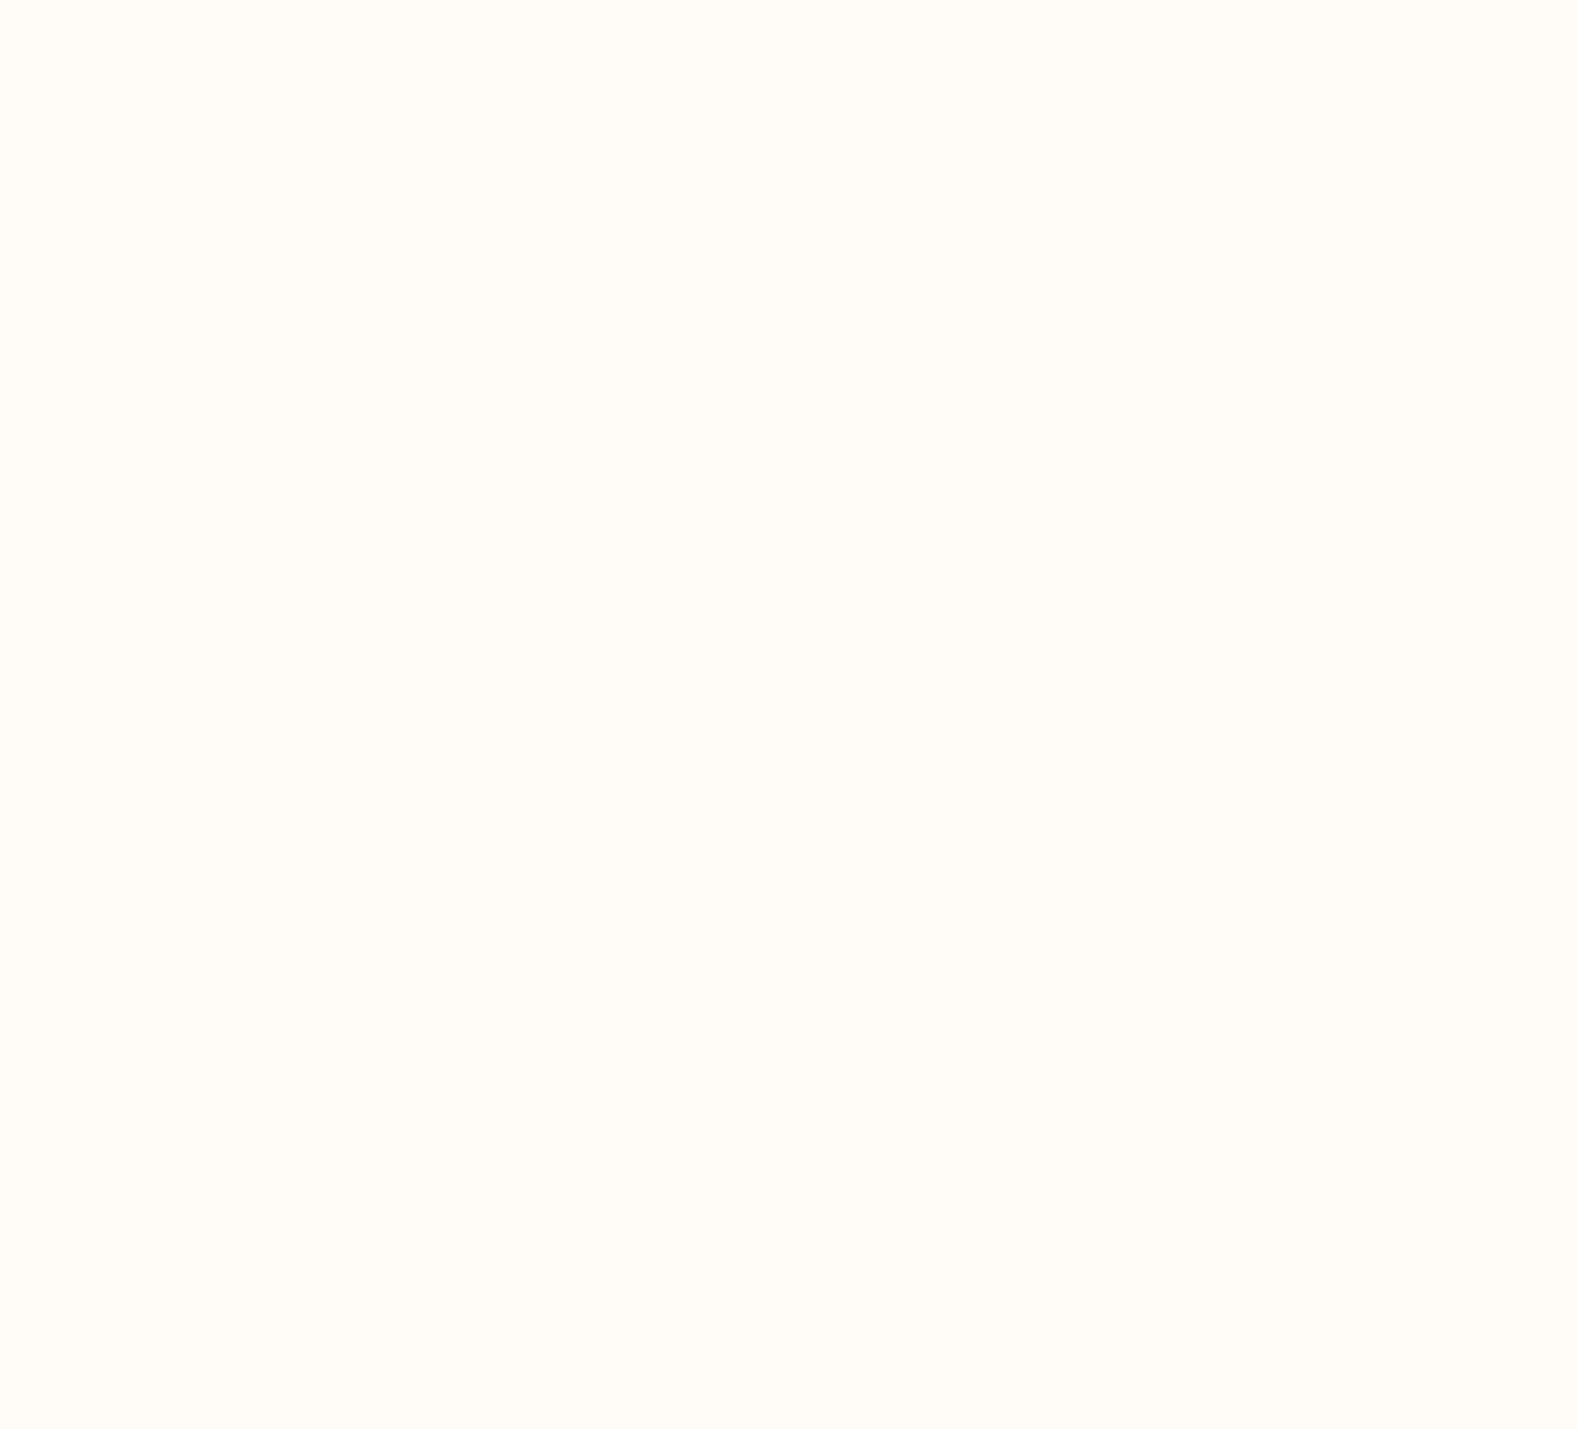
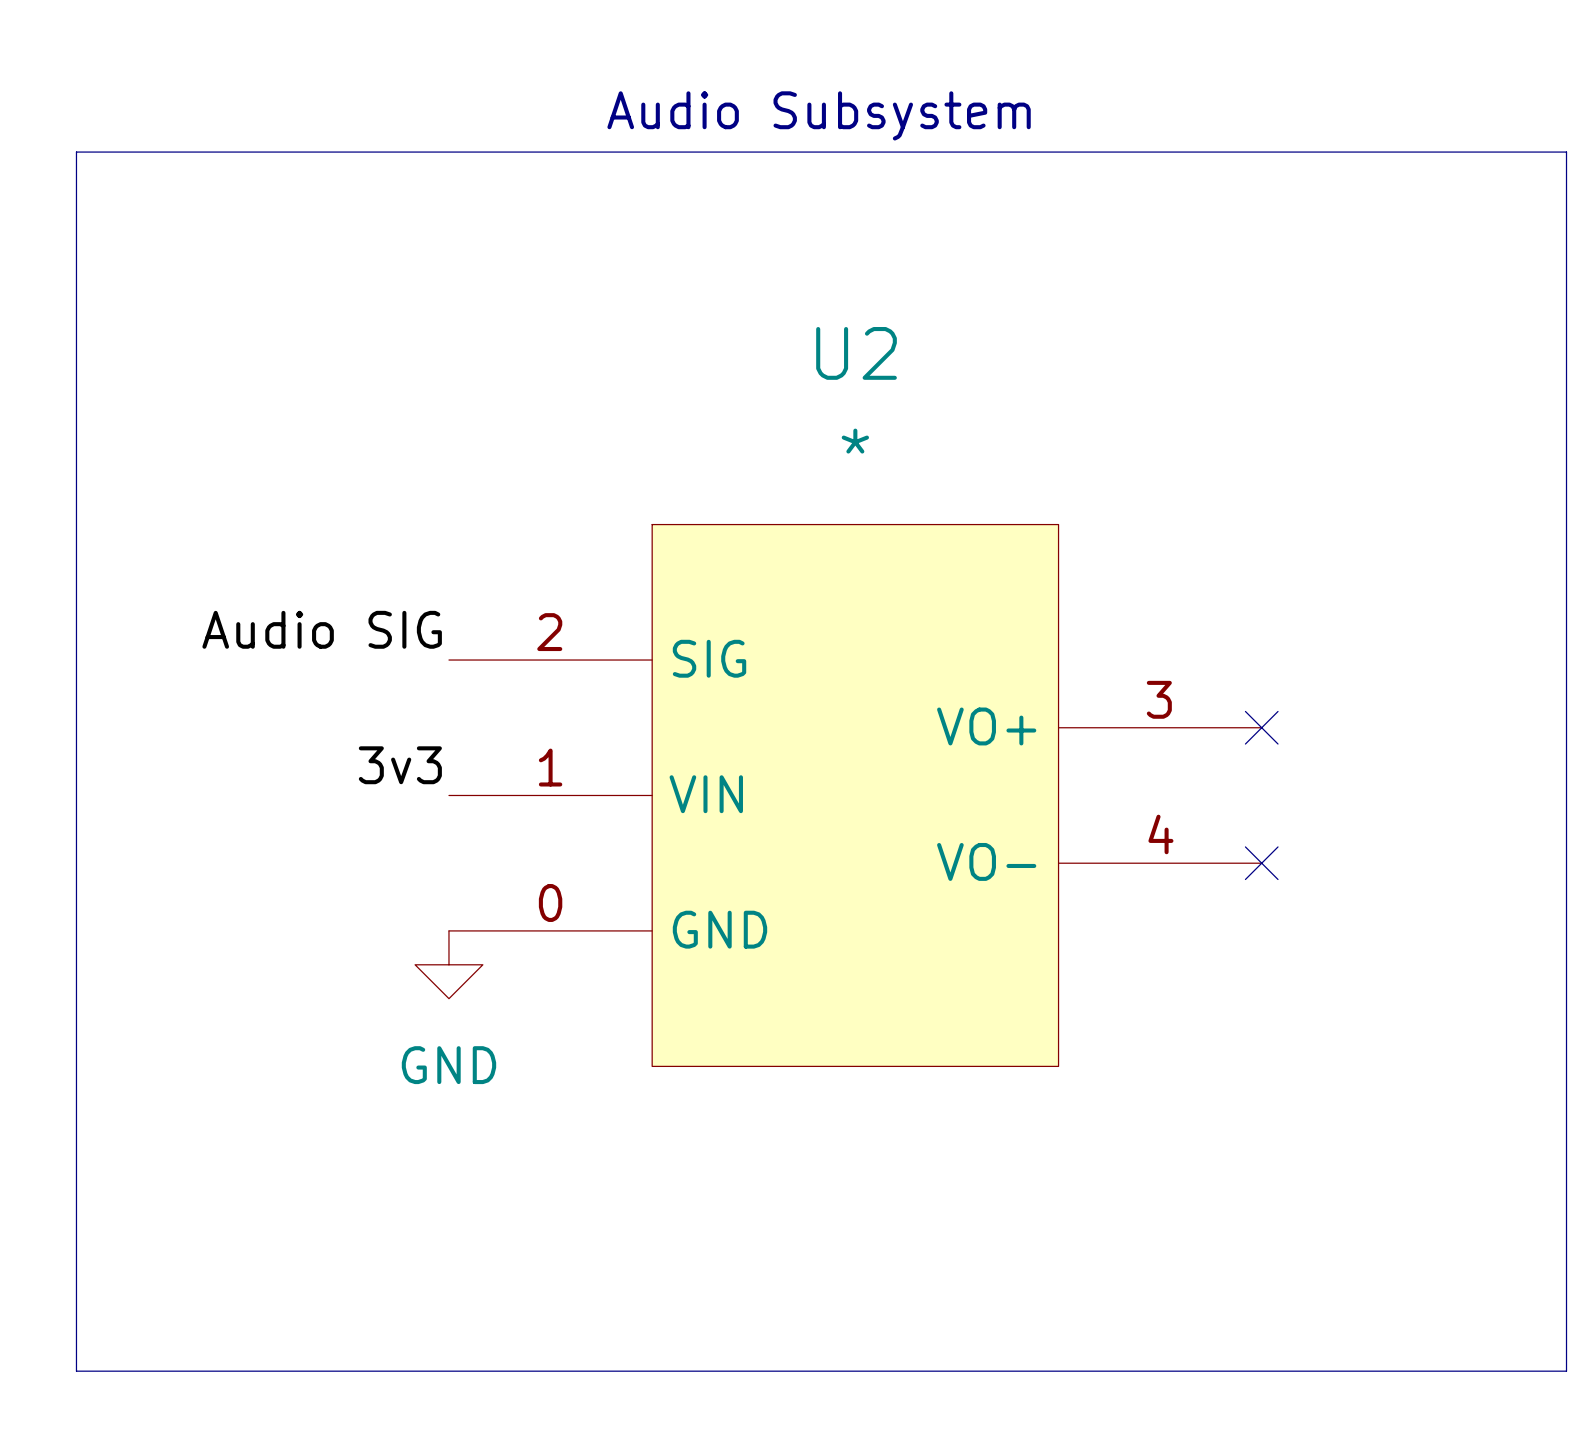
text: none -> Audio Subsystem (819, 115)
line: none -> (76, 152) (1566, 152) (1566, 1371) (76, 1371) (76, 152)
label: none -> Audio SIG (322, 629)
no-connect mark: none -> (1261, 727)
label: none -> 3v3 (400, 765)
U2: none -> * (855, 795)
no-connect mark: none -> (1261, 863)
power symbol: none -> GND (448, 964)

